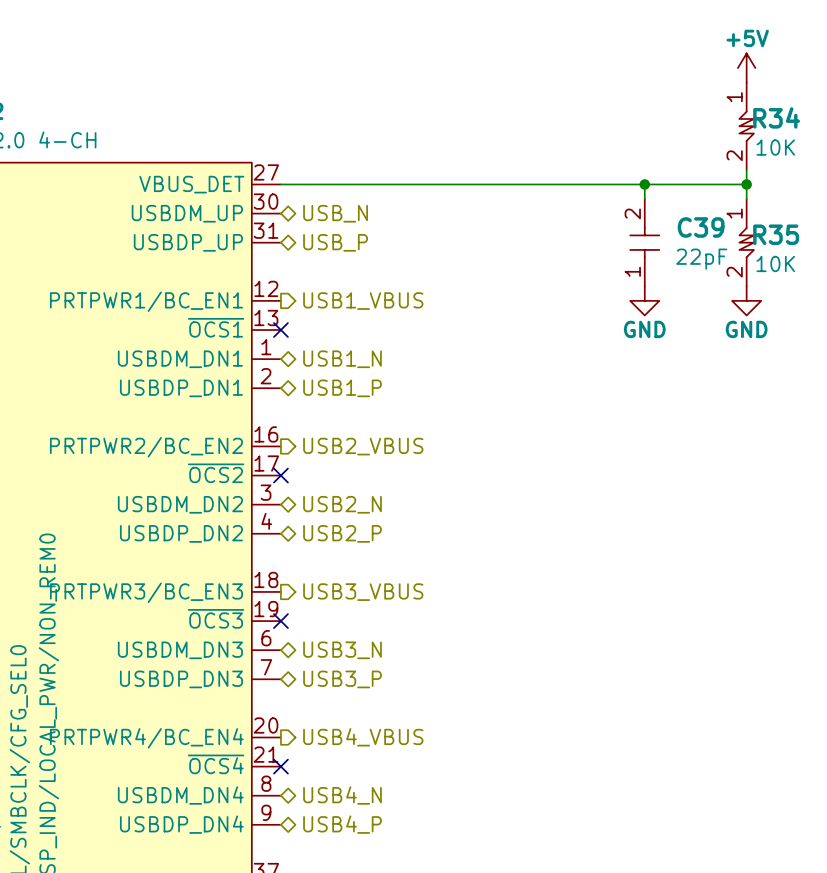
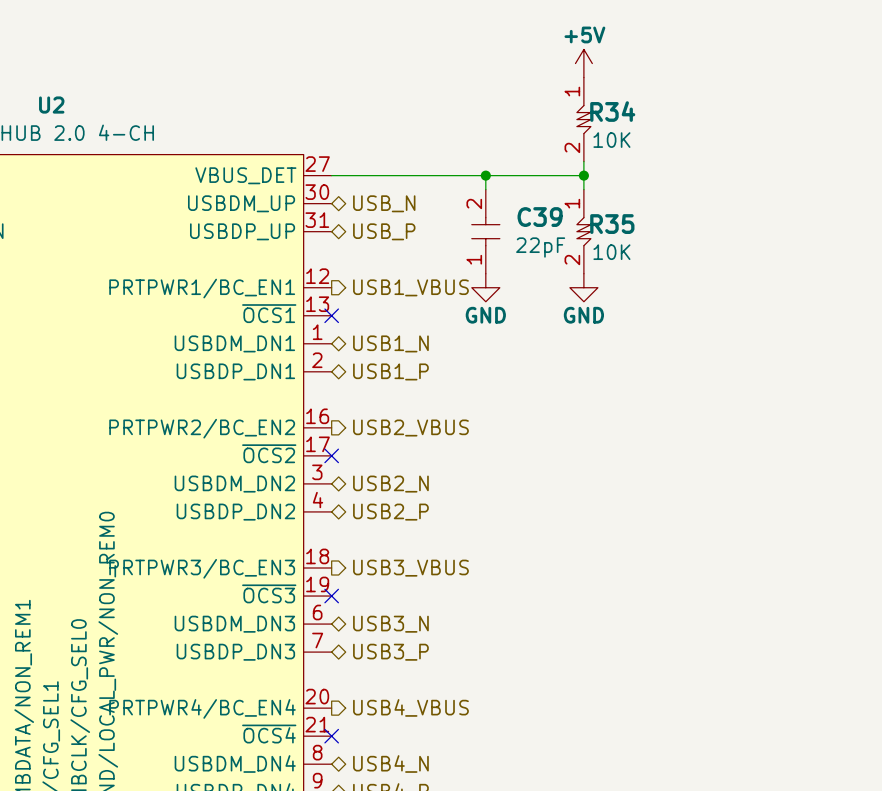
power symbol position: +5V (746, 68) -> +5V (583, 63)
R34 position: (746, 126) -> (583, 119)
wire: (746, 169) (746, 199) -> (583, 161) (583, 189)
junction: none -> (485, 175)
wire: (542, 184) (746, 184) -> none
junction: none -> (583, 175)
wire: (644, 184) (644, 199) -> (485, 175) (485, 189)
junction: (644, 184) -> none
junction: (746, 184) -> none
C39 position: (644, 242) -> (485, 231)
R35 position: (746, 242) -> (583, 231)
power symbol: none -> GND (485, 287)
power symbol: none -> GND (583, 287)
power symbol: GND (644, 300) -> none
power symbol: GND (746, 300) -> none

